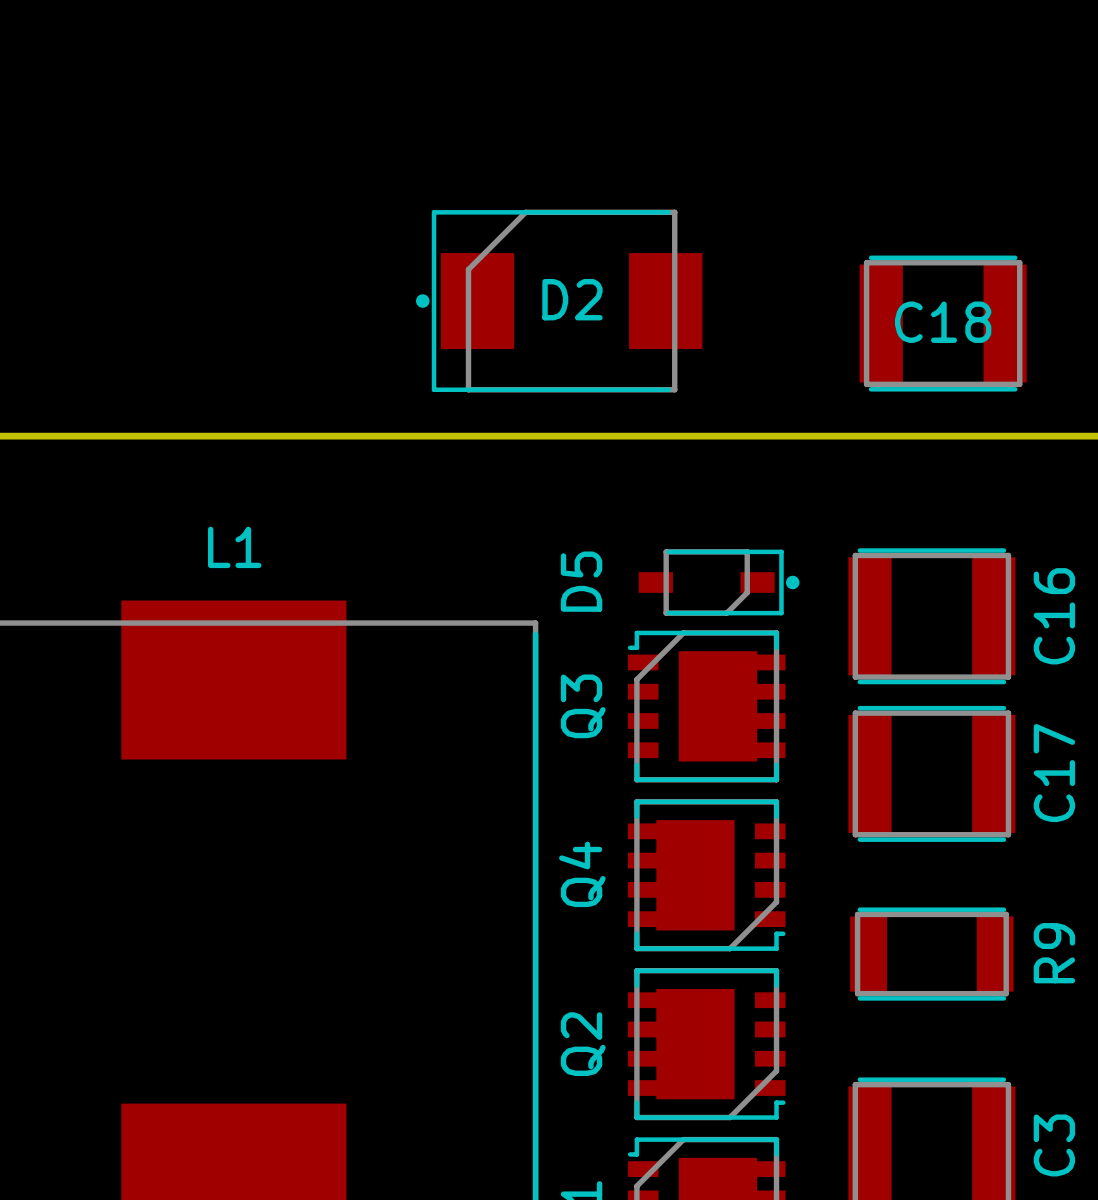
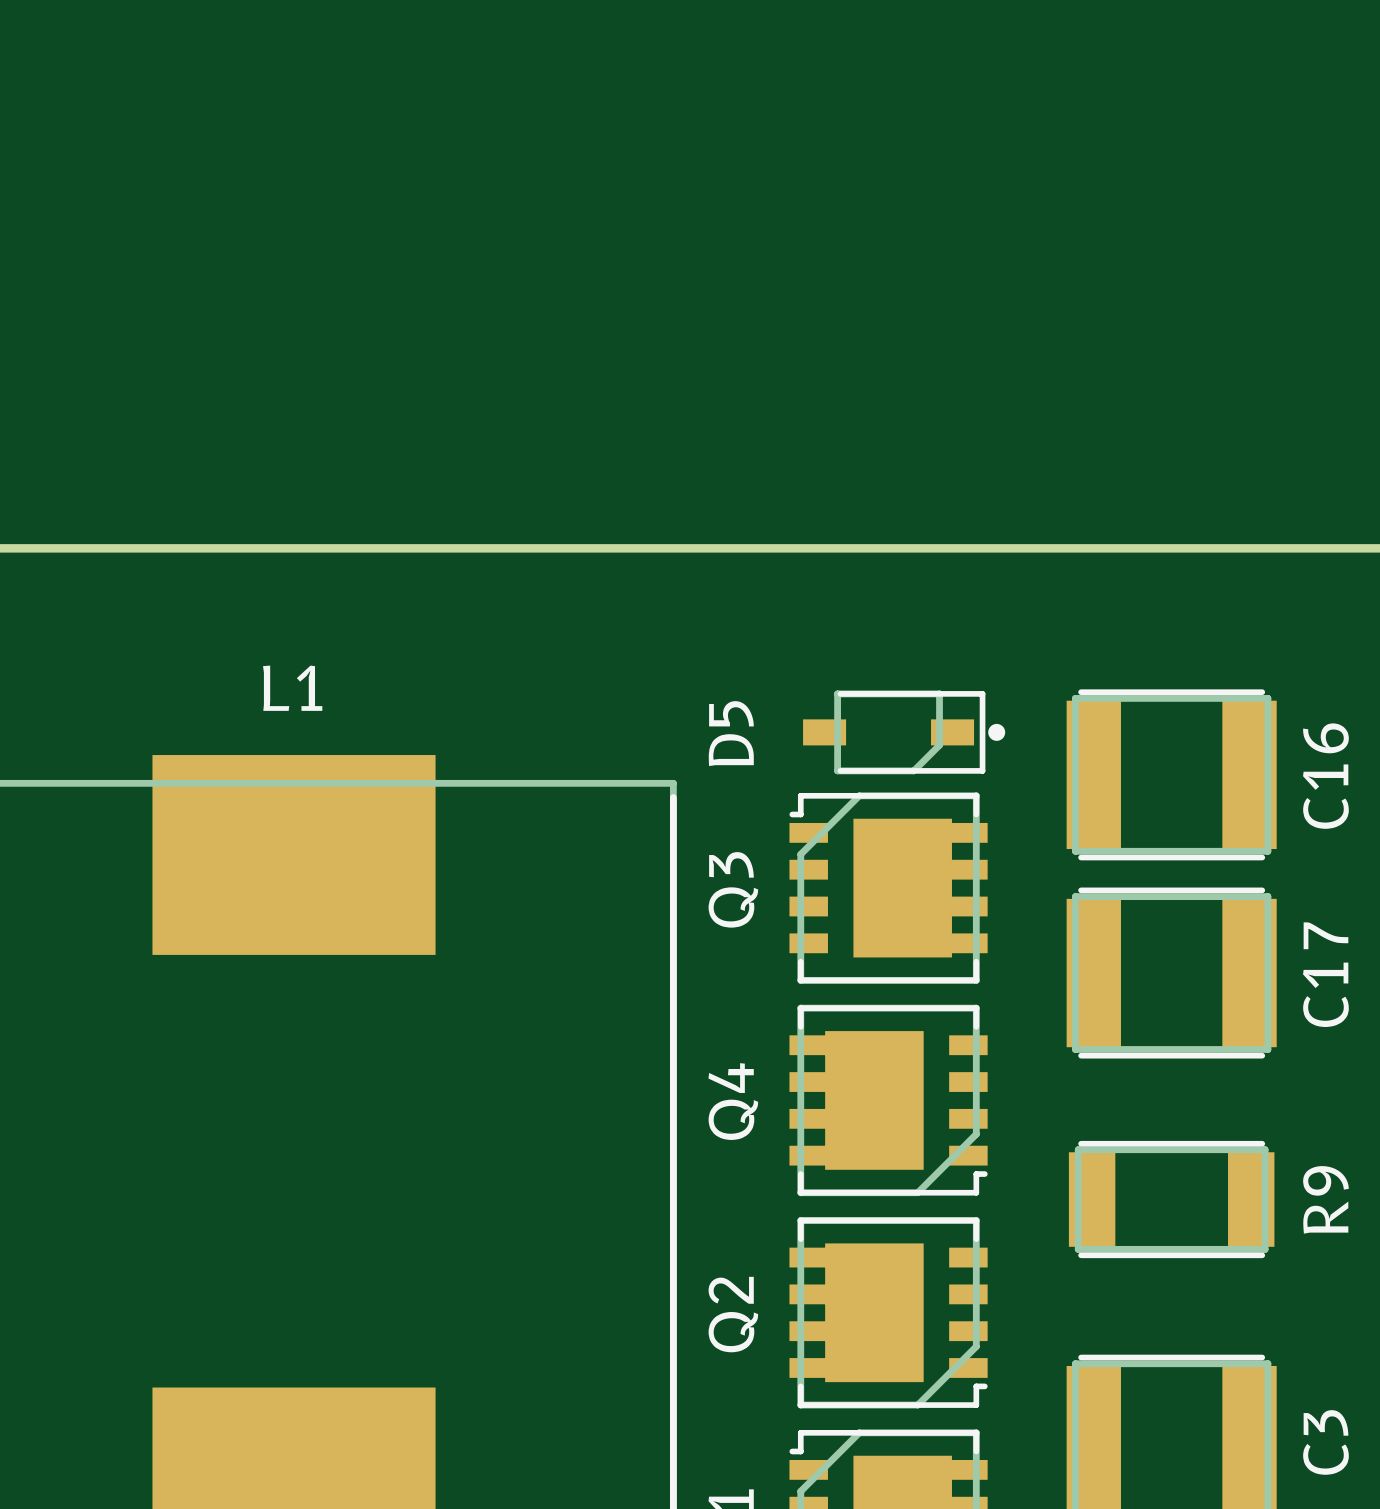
D2: (559, 301) -> none
C18: (943, 323) -> none

